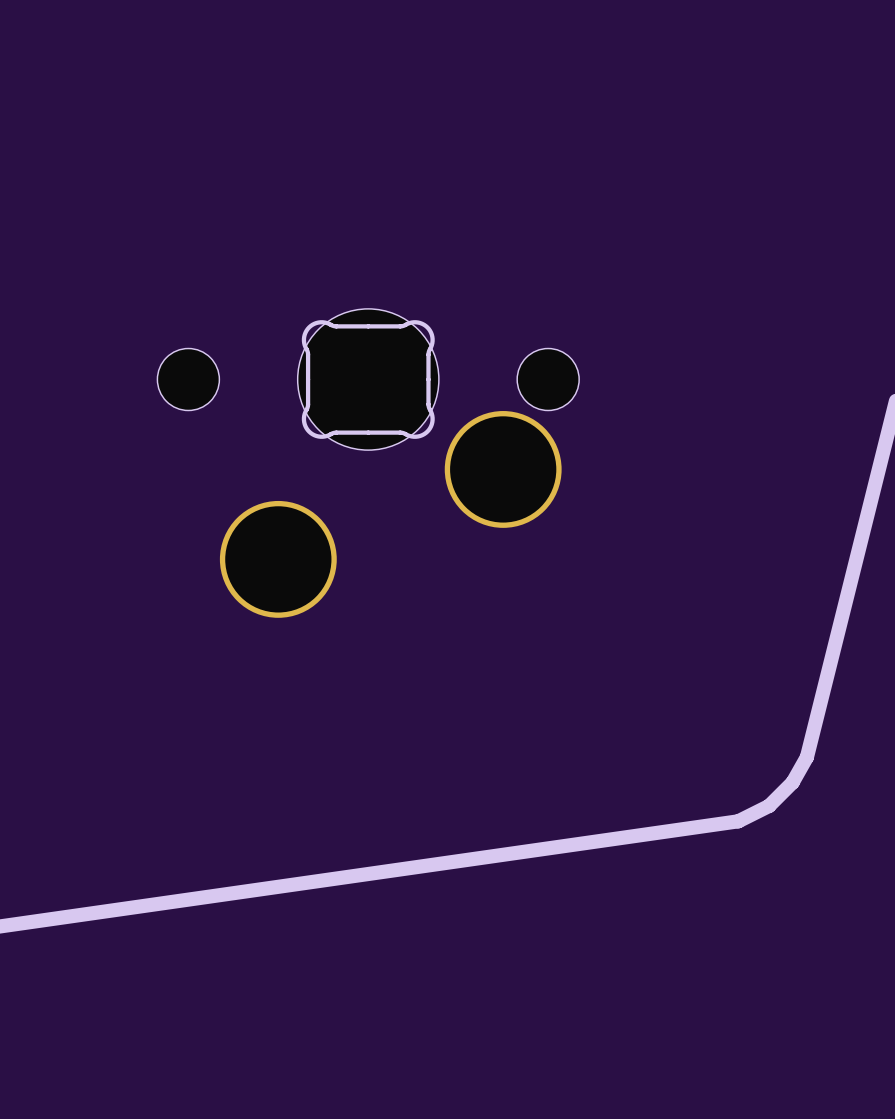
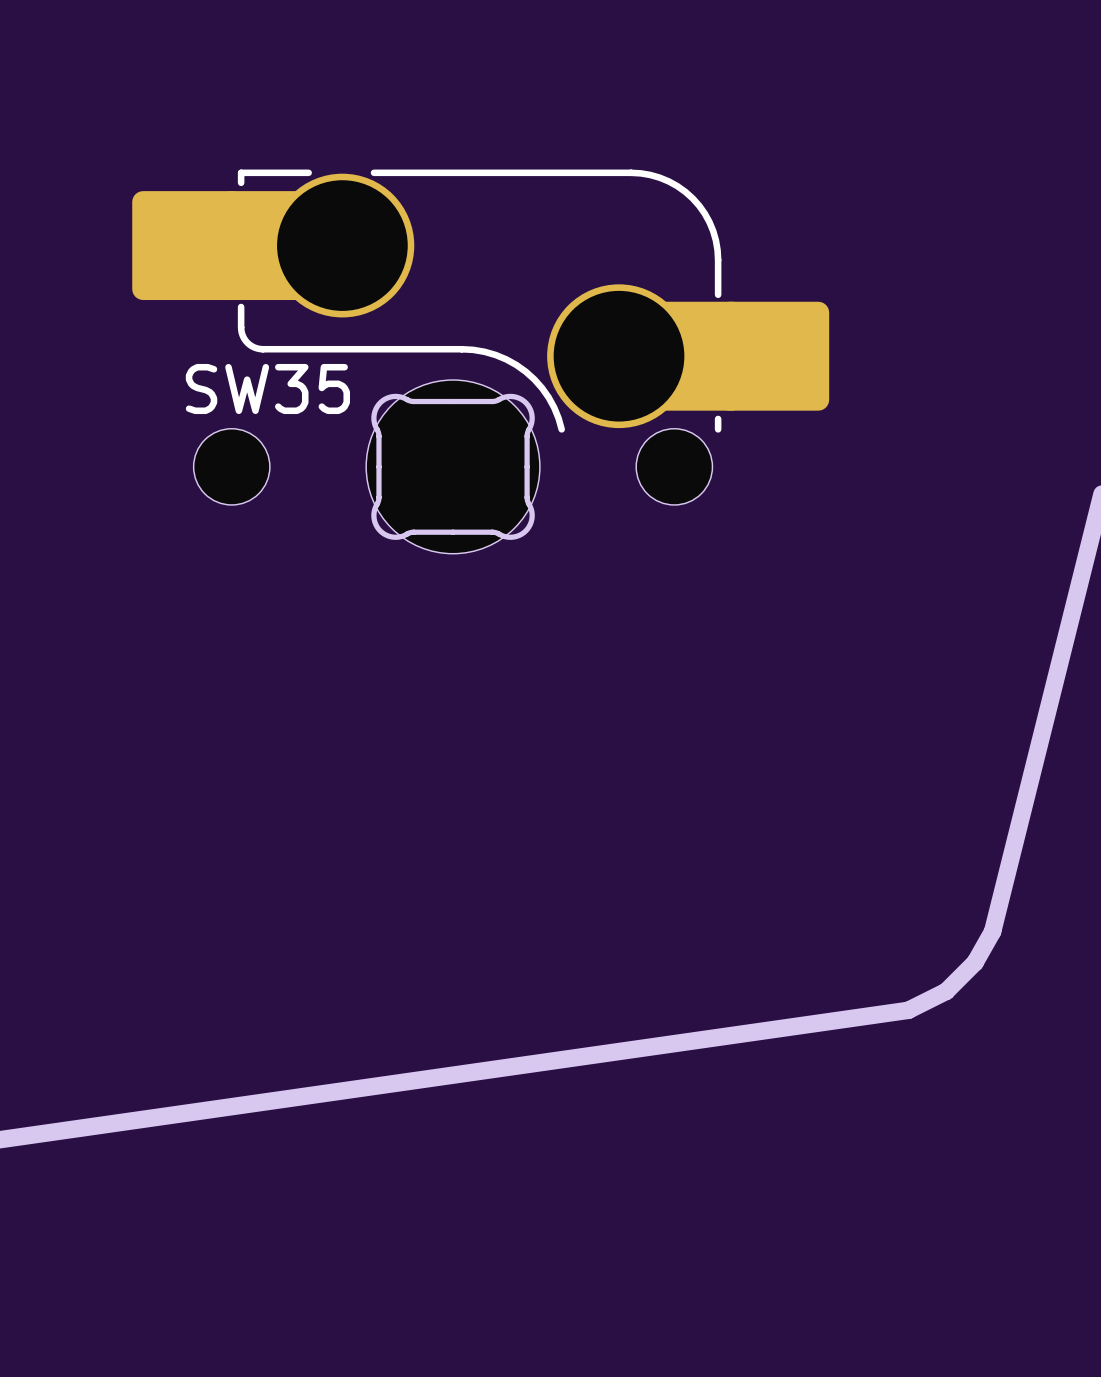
SW35: none -> (480, 361)
part: (368, 463) -> none

